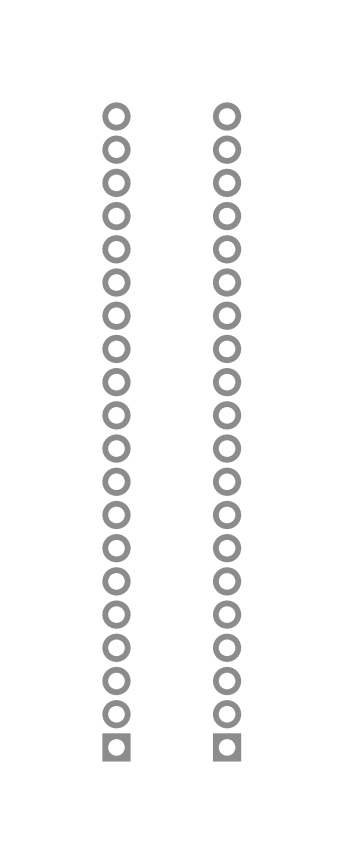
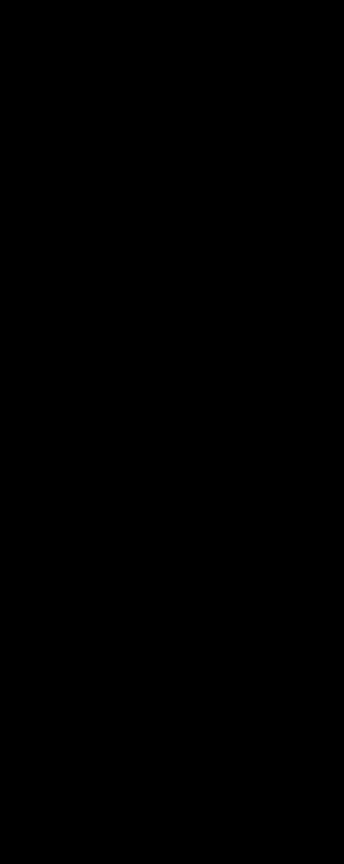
part: (116, 431) -> none
part: (227, 431) -> none

